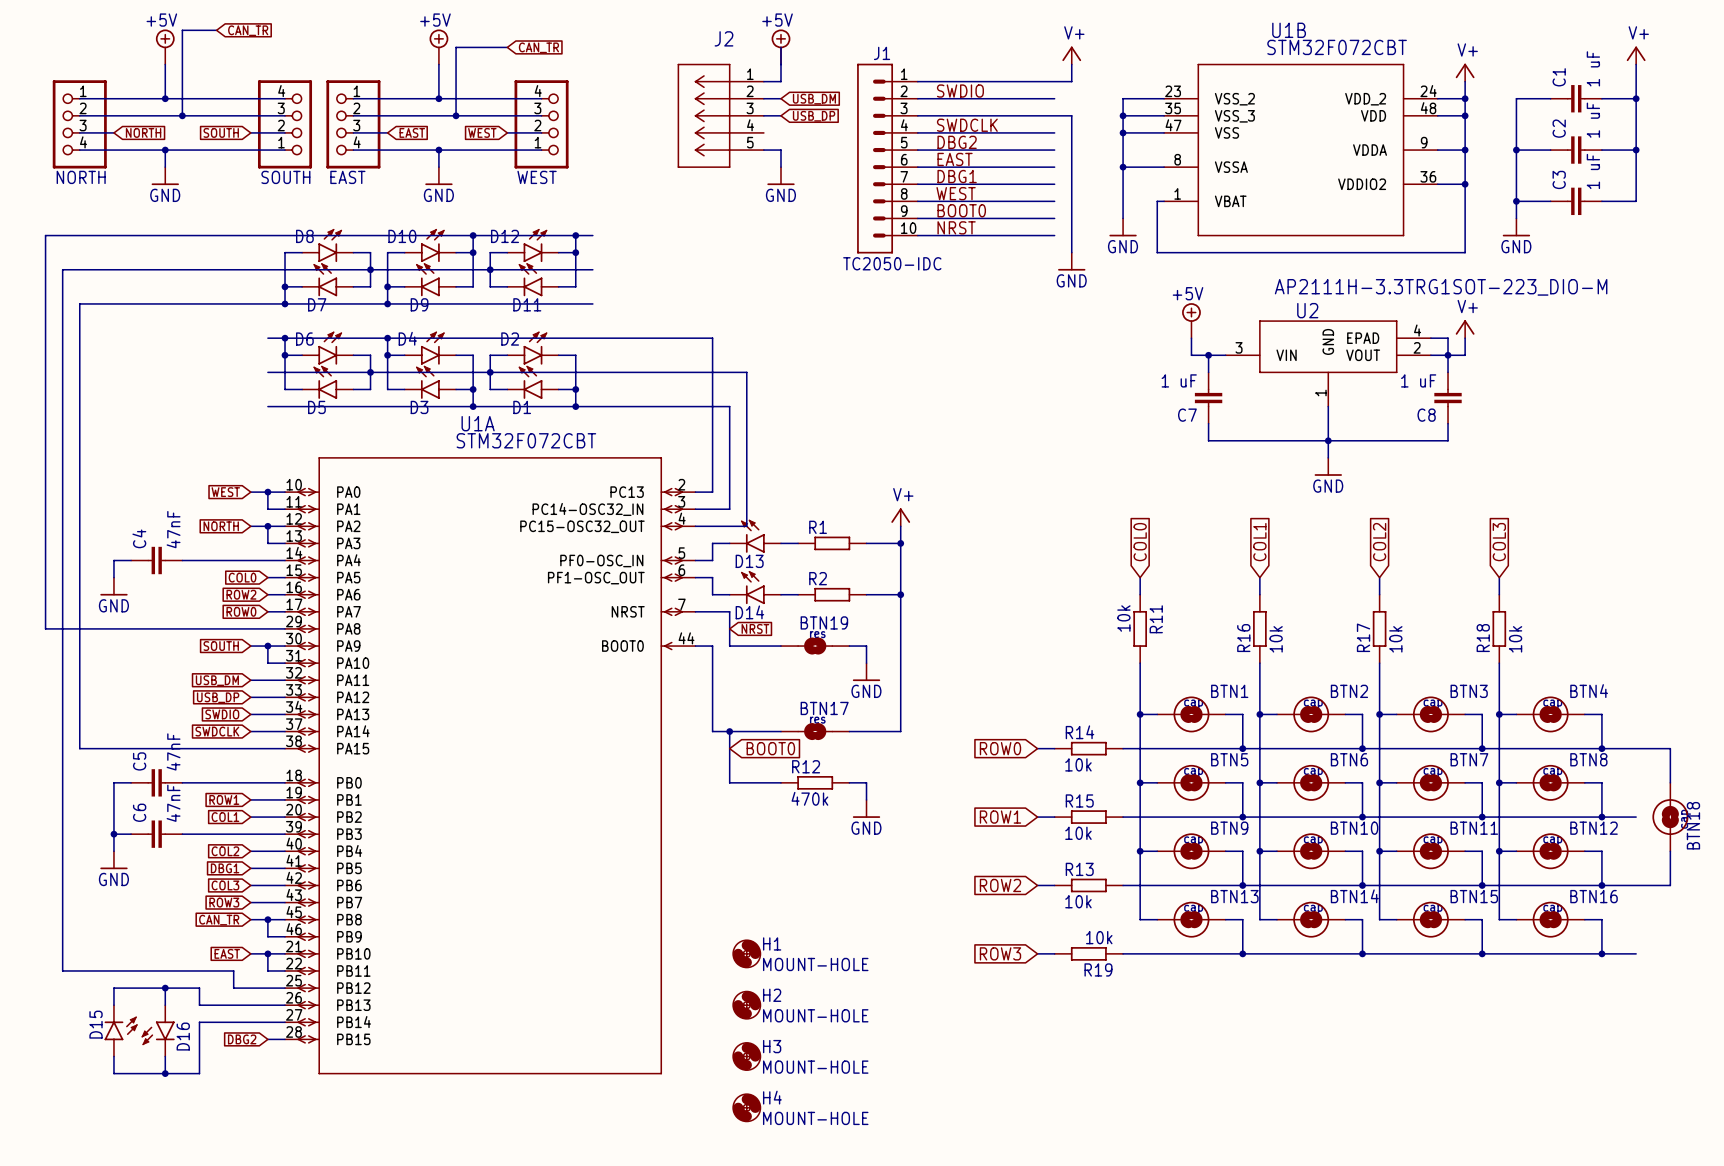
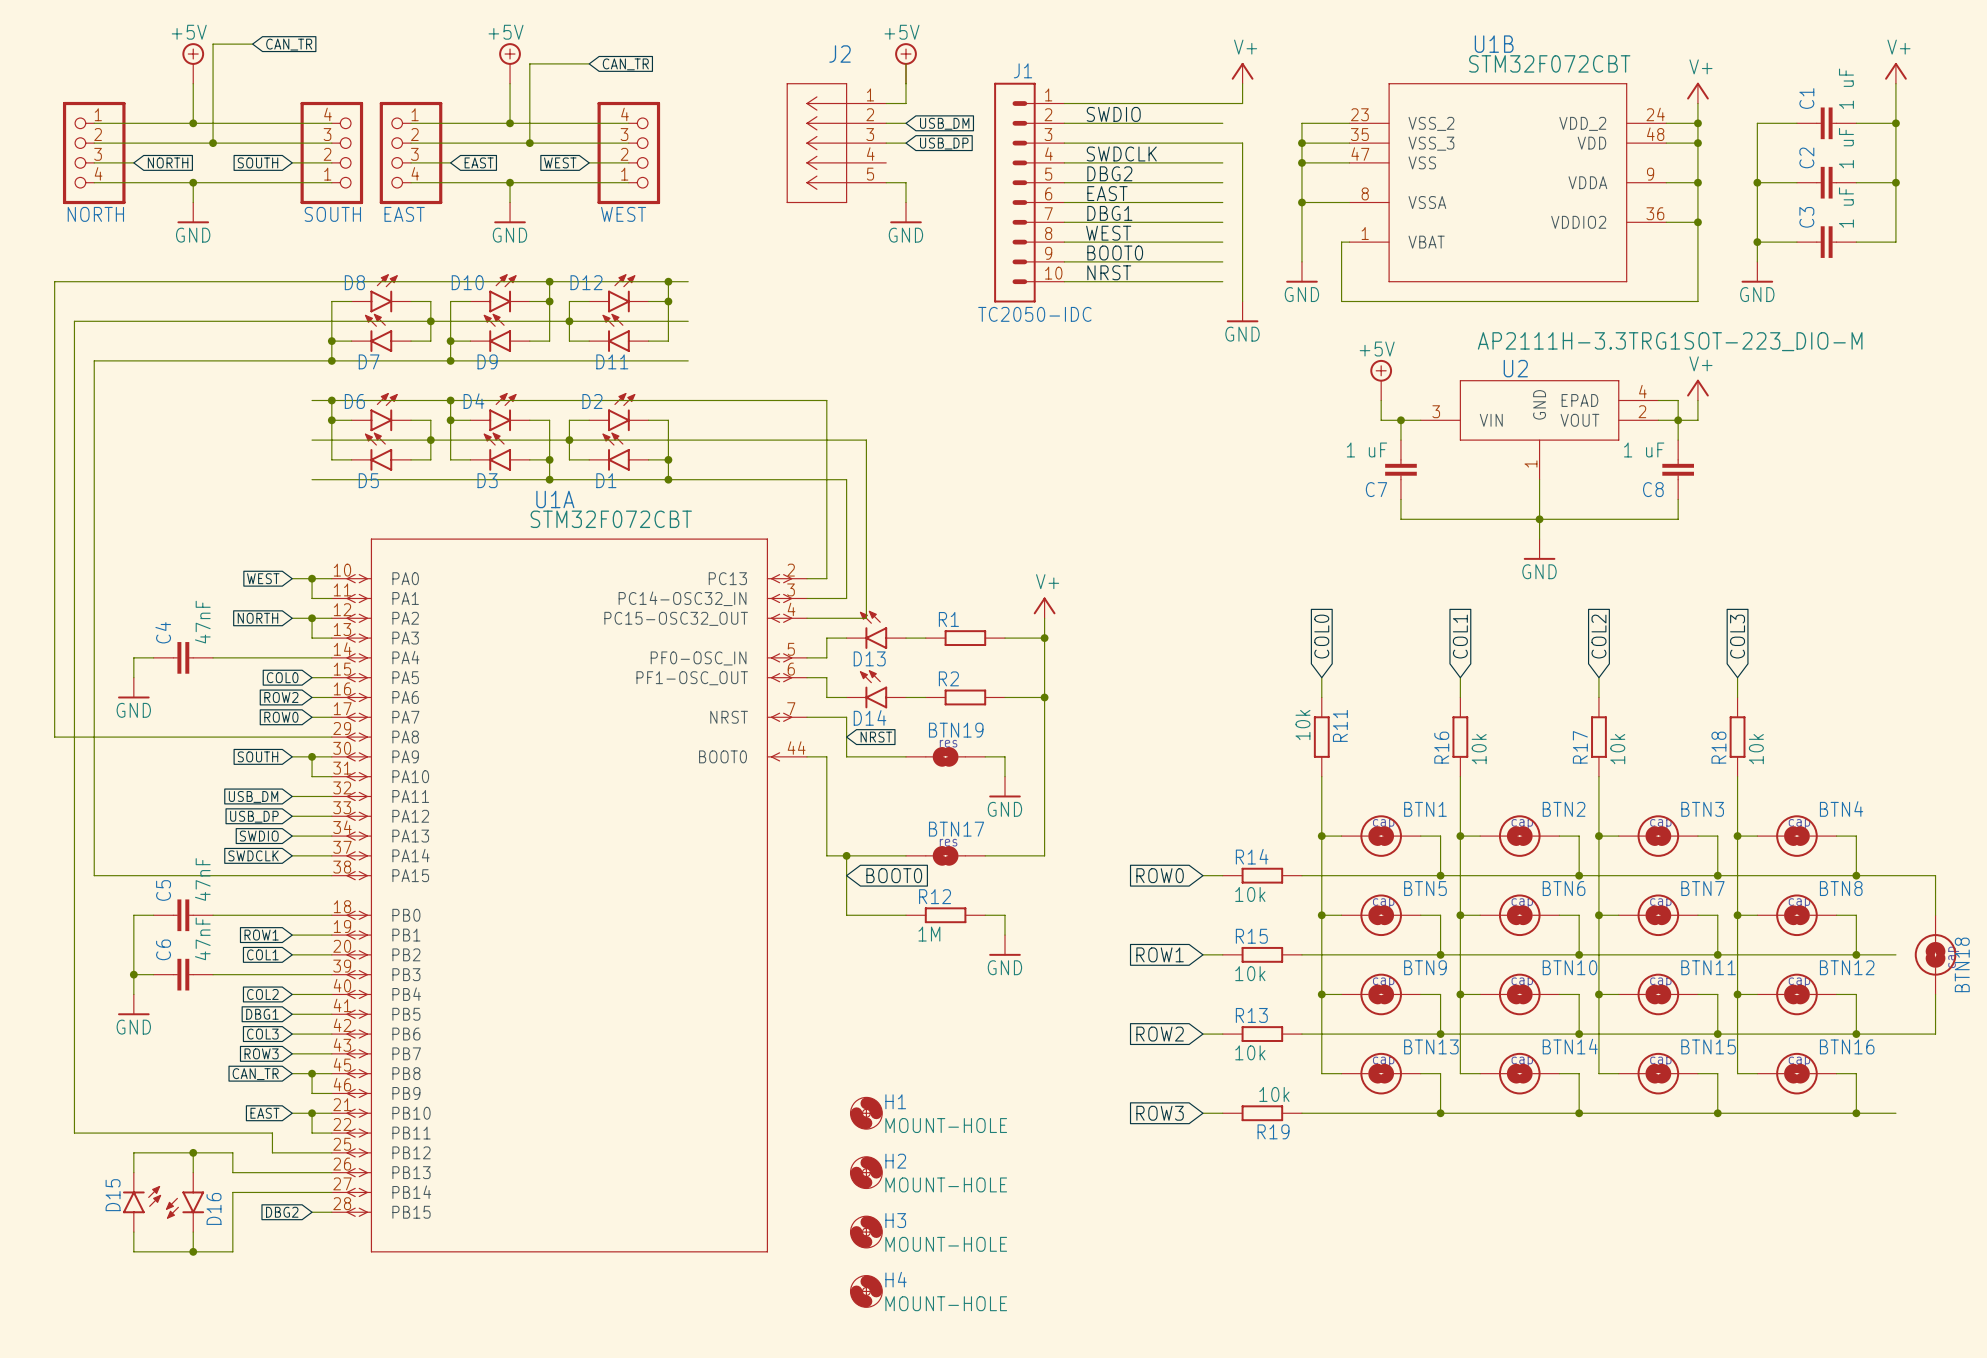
R12 value: 470k (809, 798) -> 1M (929, 934)

